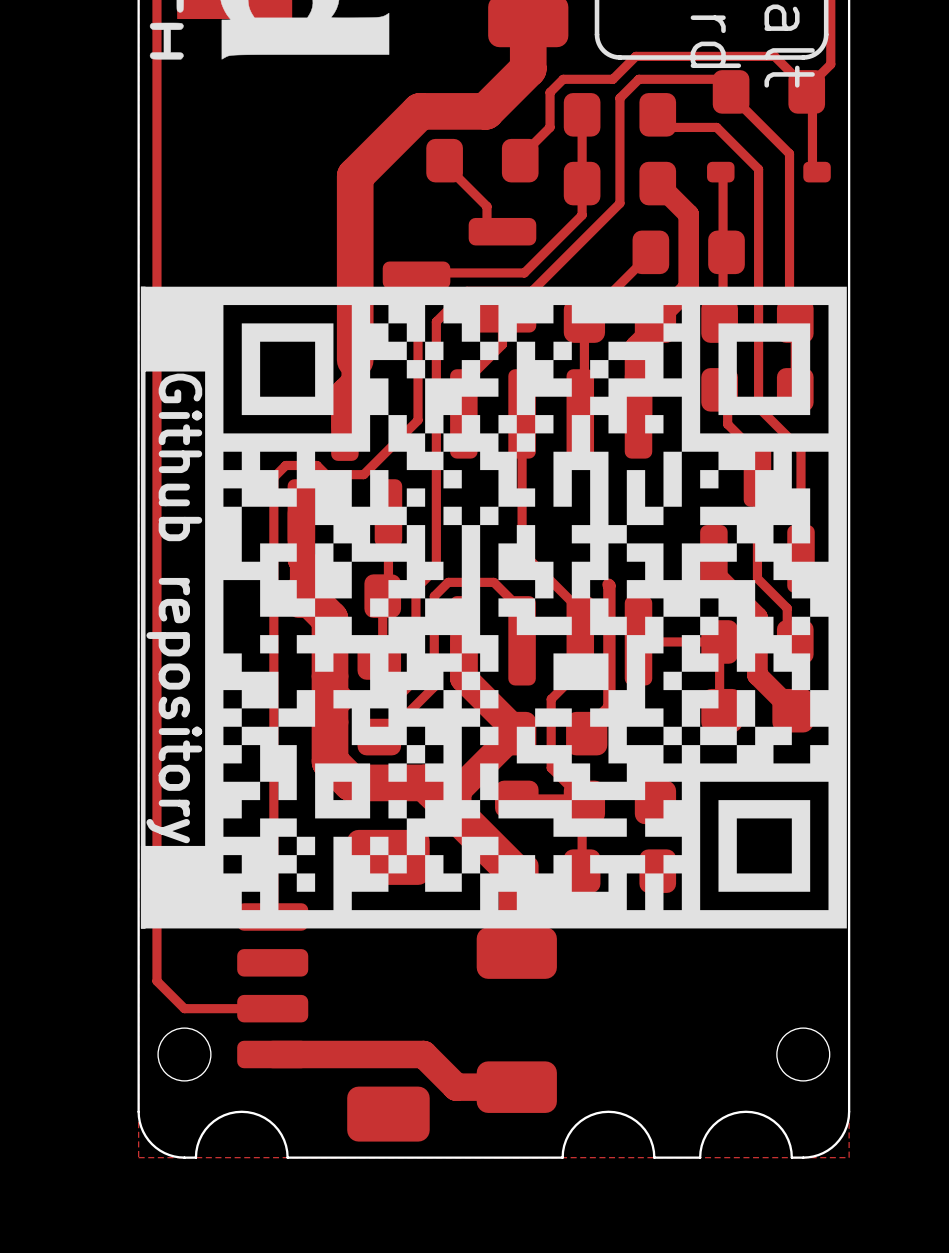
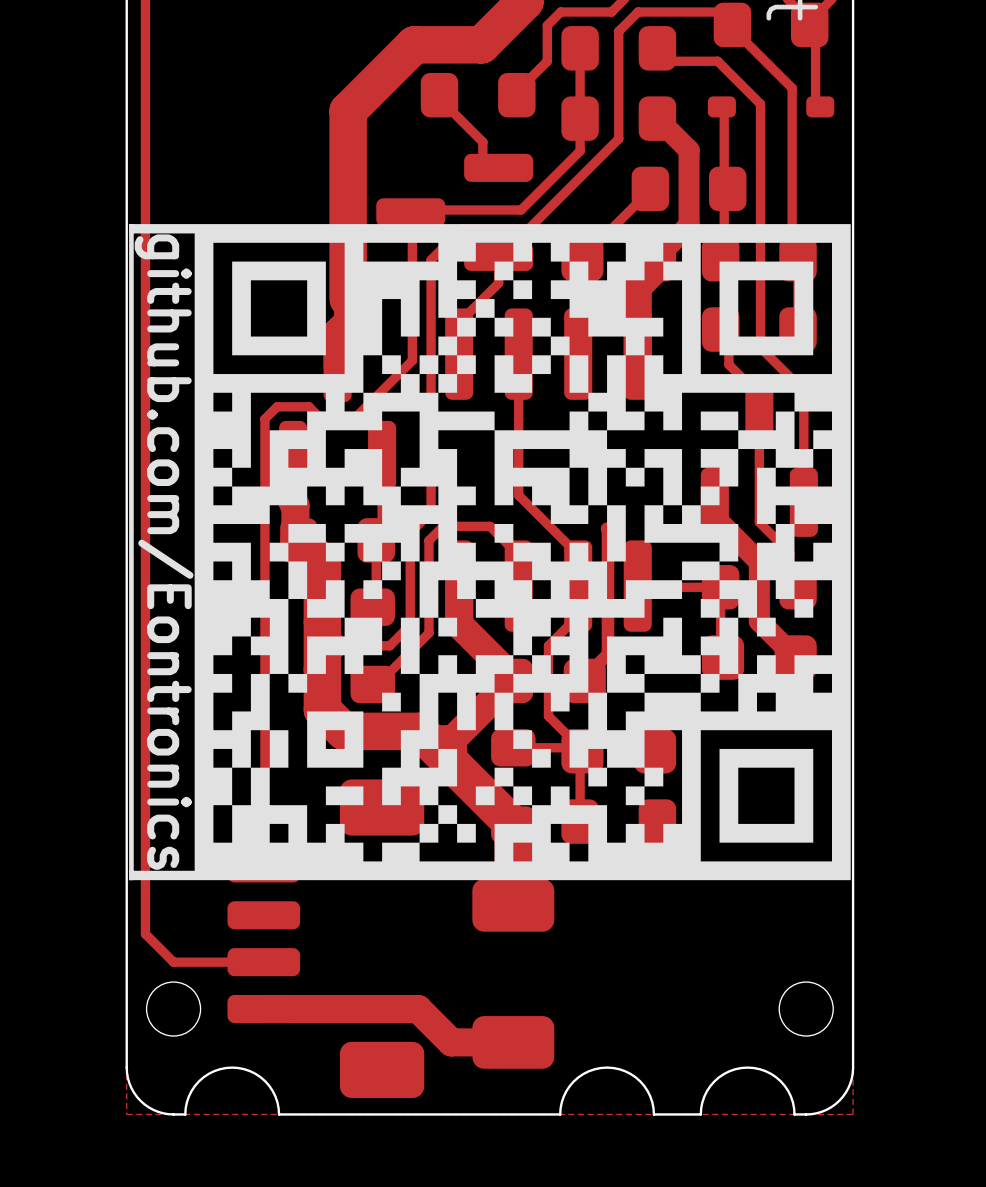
drawing shape: [140, 286, 847, 929] -> [129, 224, 851, 881]

